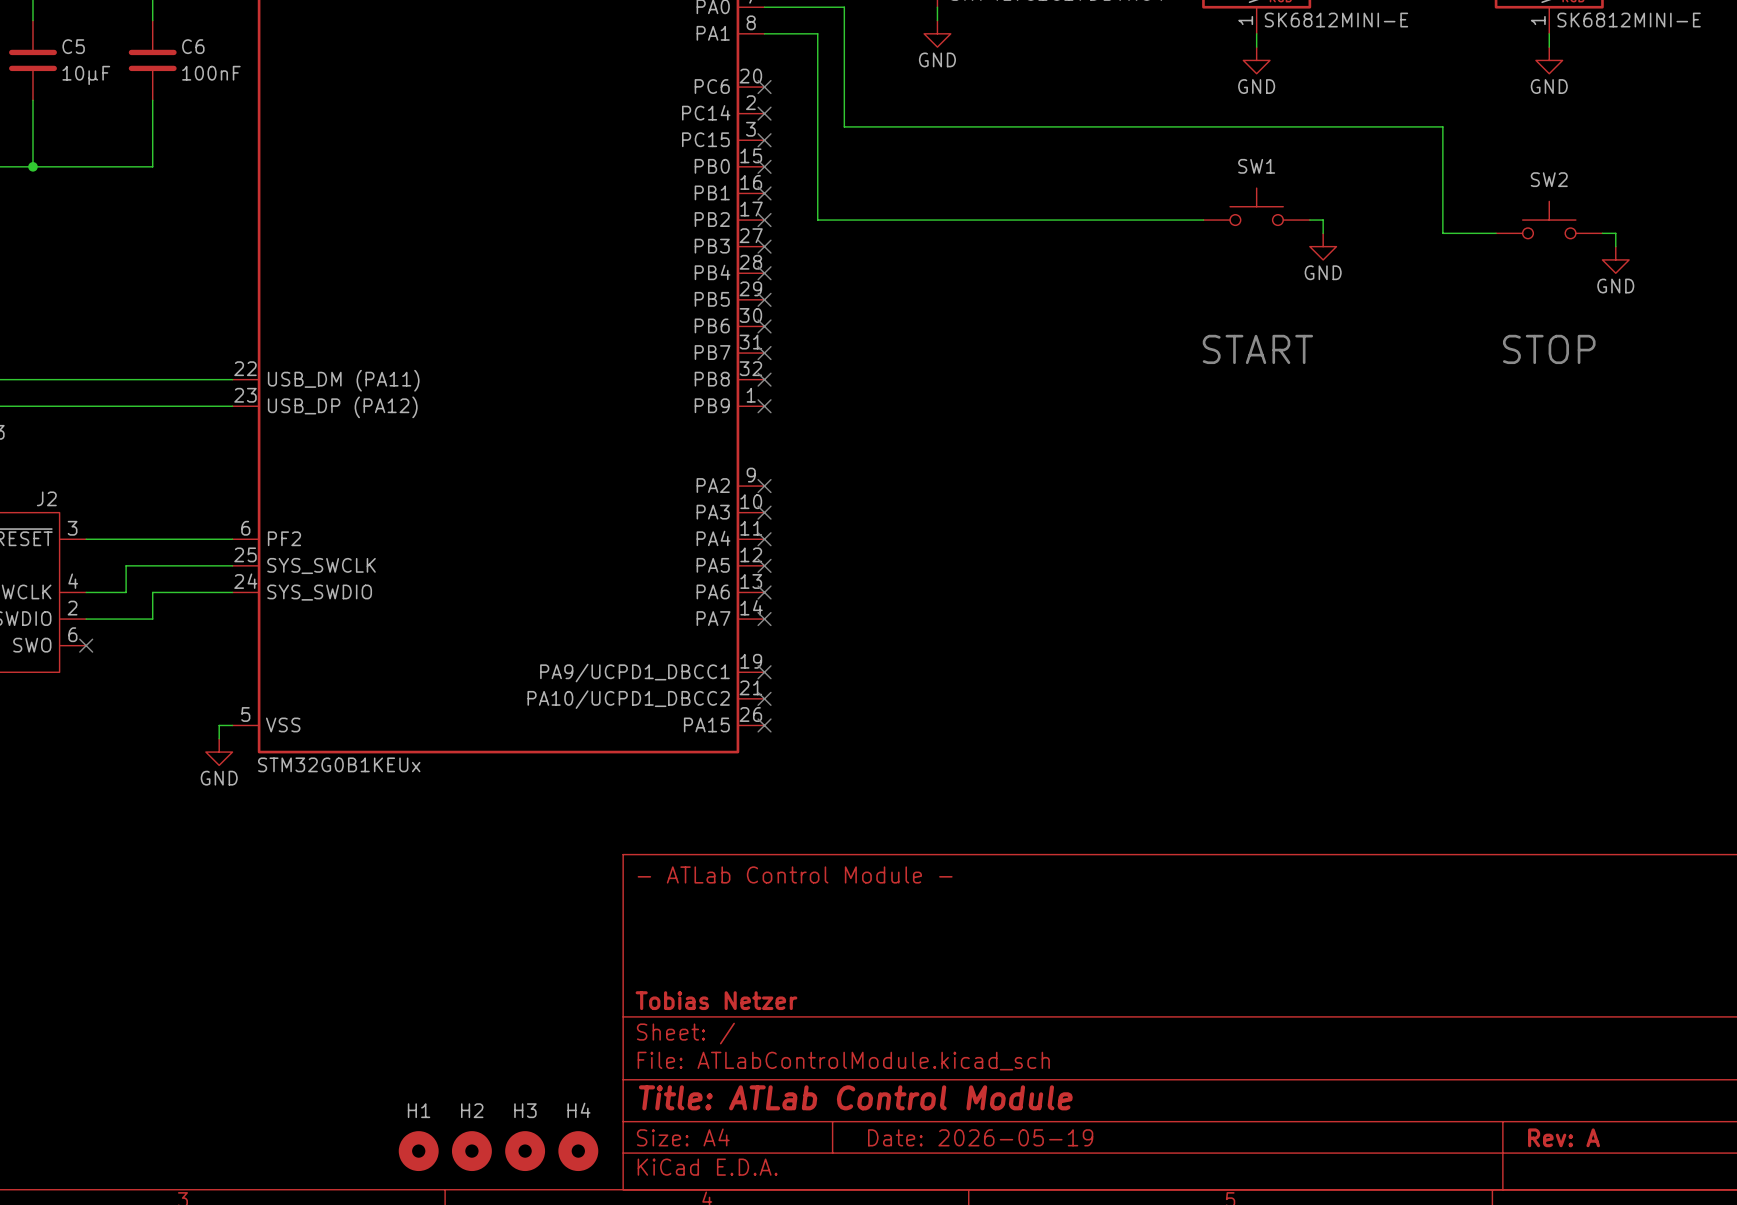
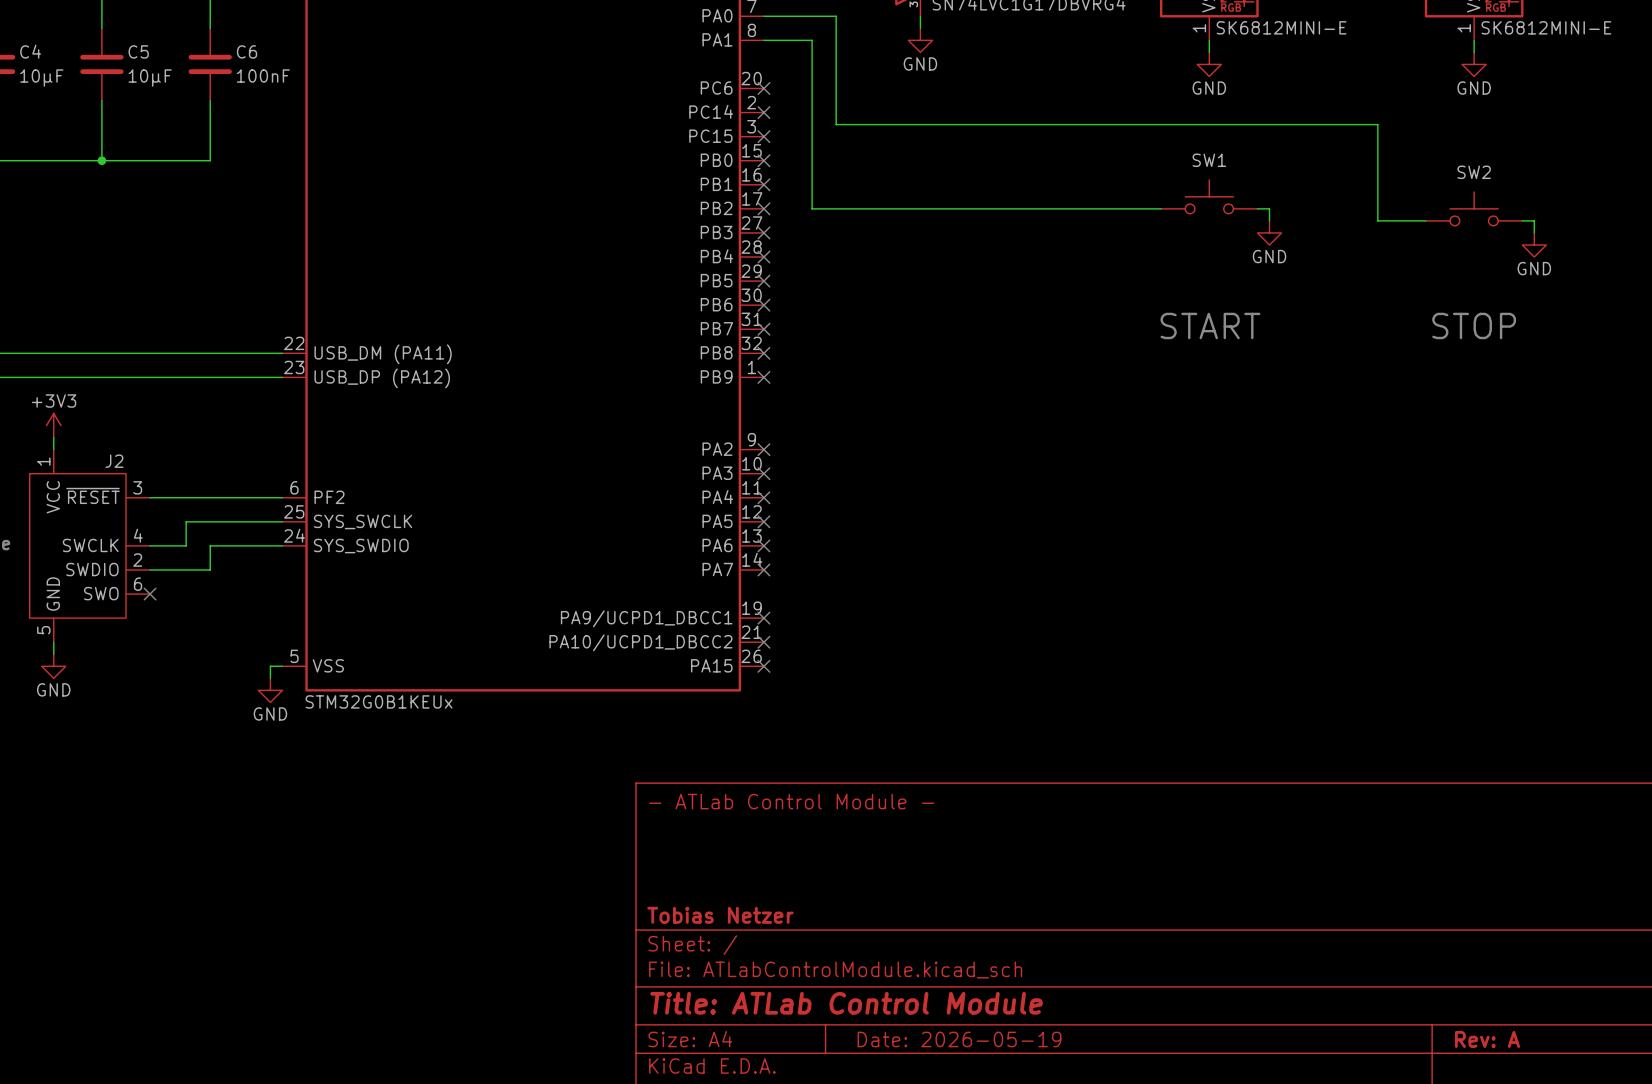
H1: (418, 1151) -> none
H2: (471, 1151) -> none
H3: (525, 1151) -> none
H4: (578, 1151) -> none

